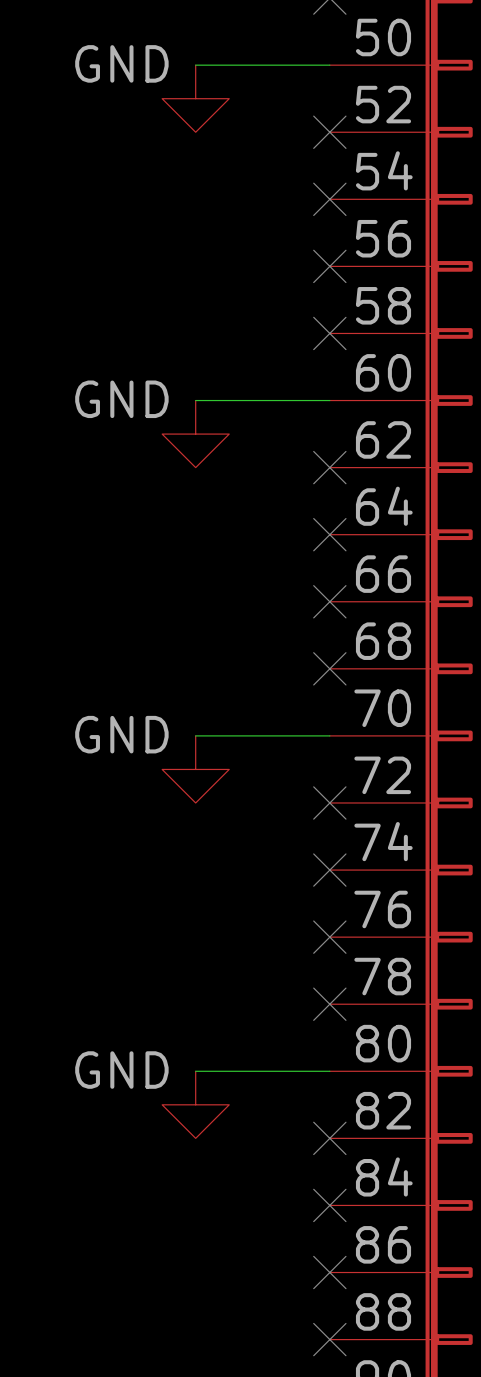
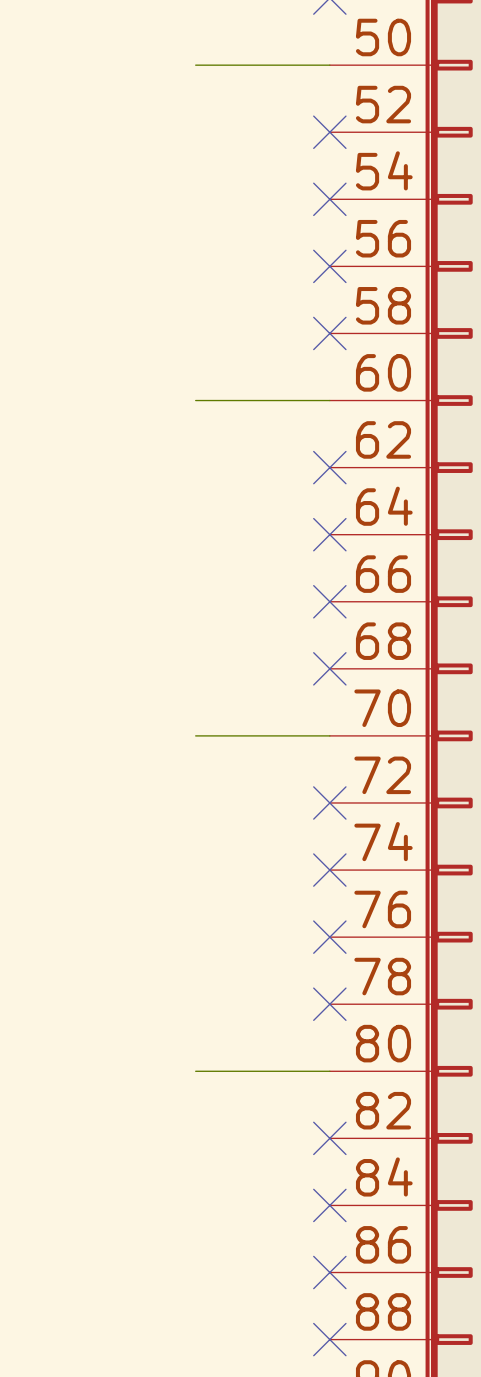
power symbol: GND (195, 98) -> none
power symbol: GND (195, 434) -> none
power symbol: GND (195, 769) -> none
power symbol: GND (195, 1104) -> none

